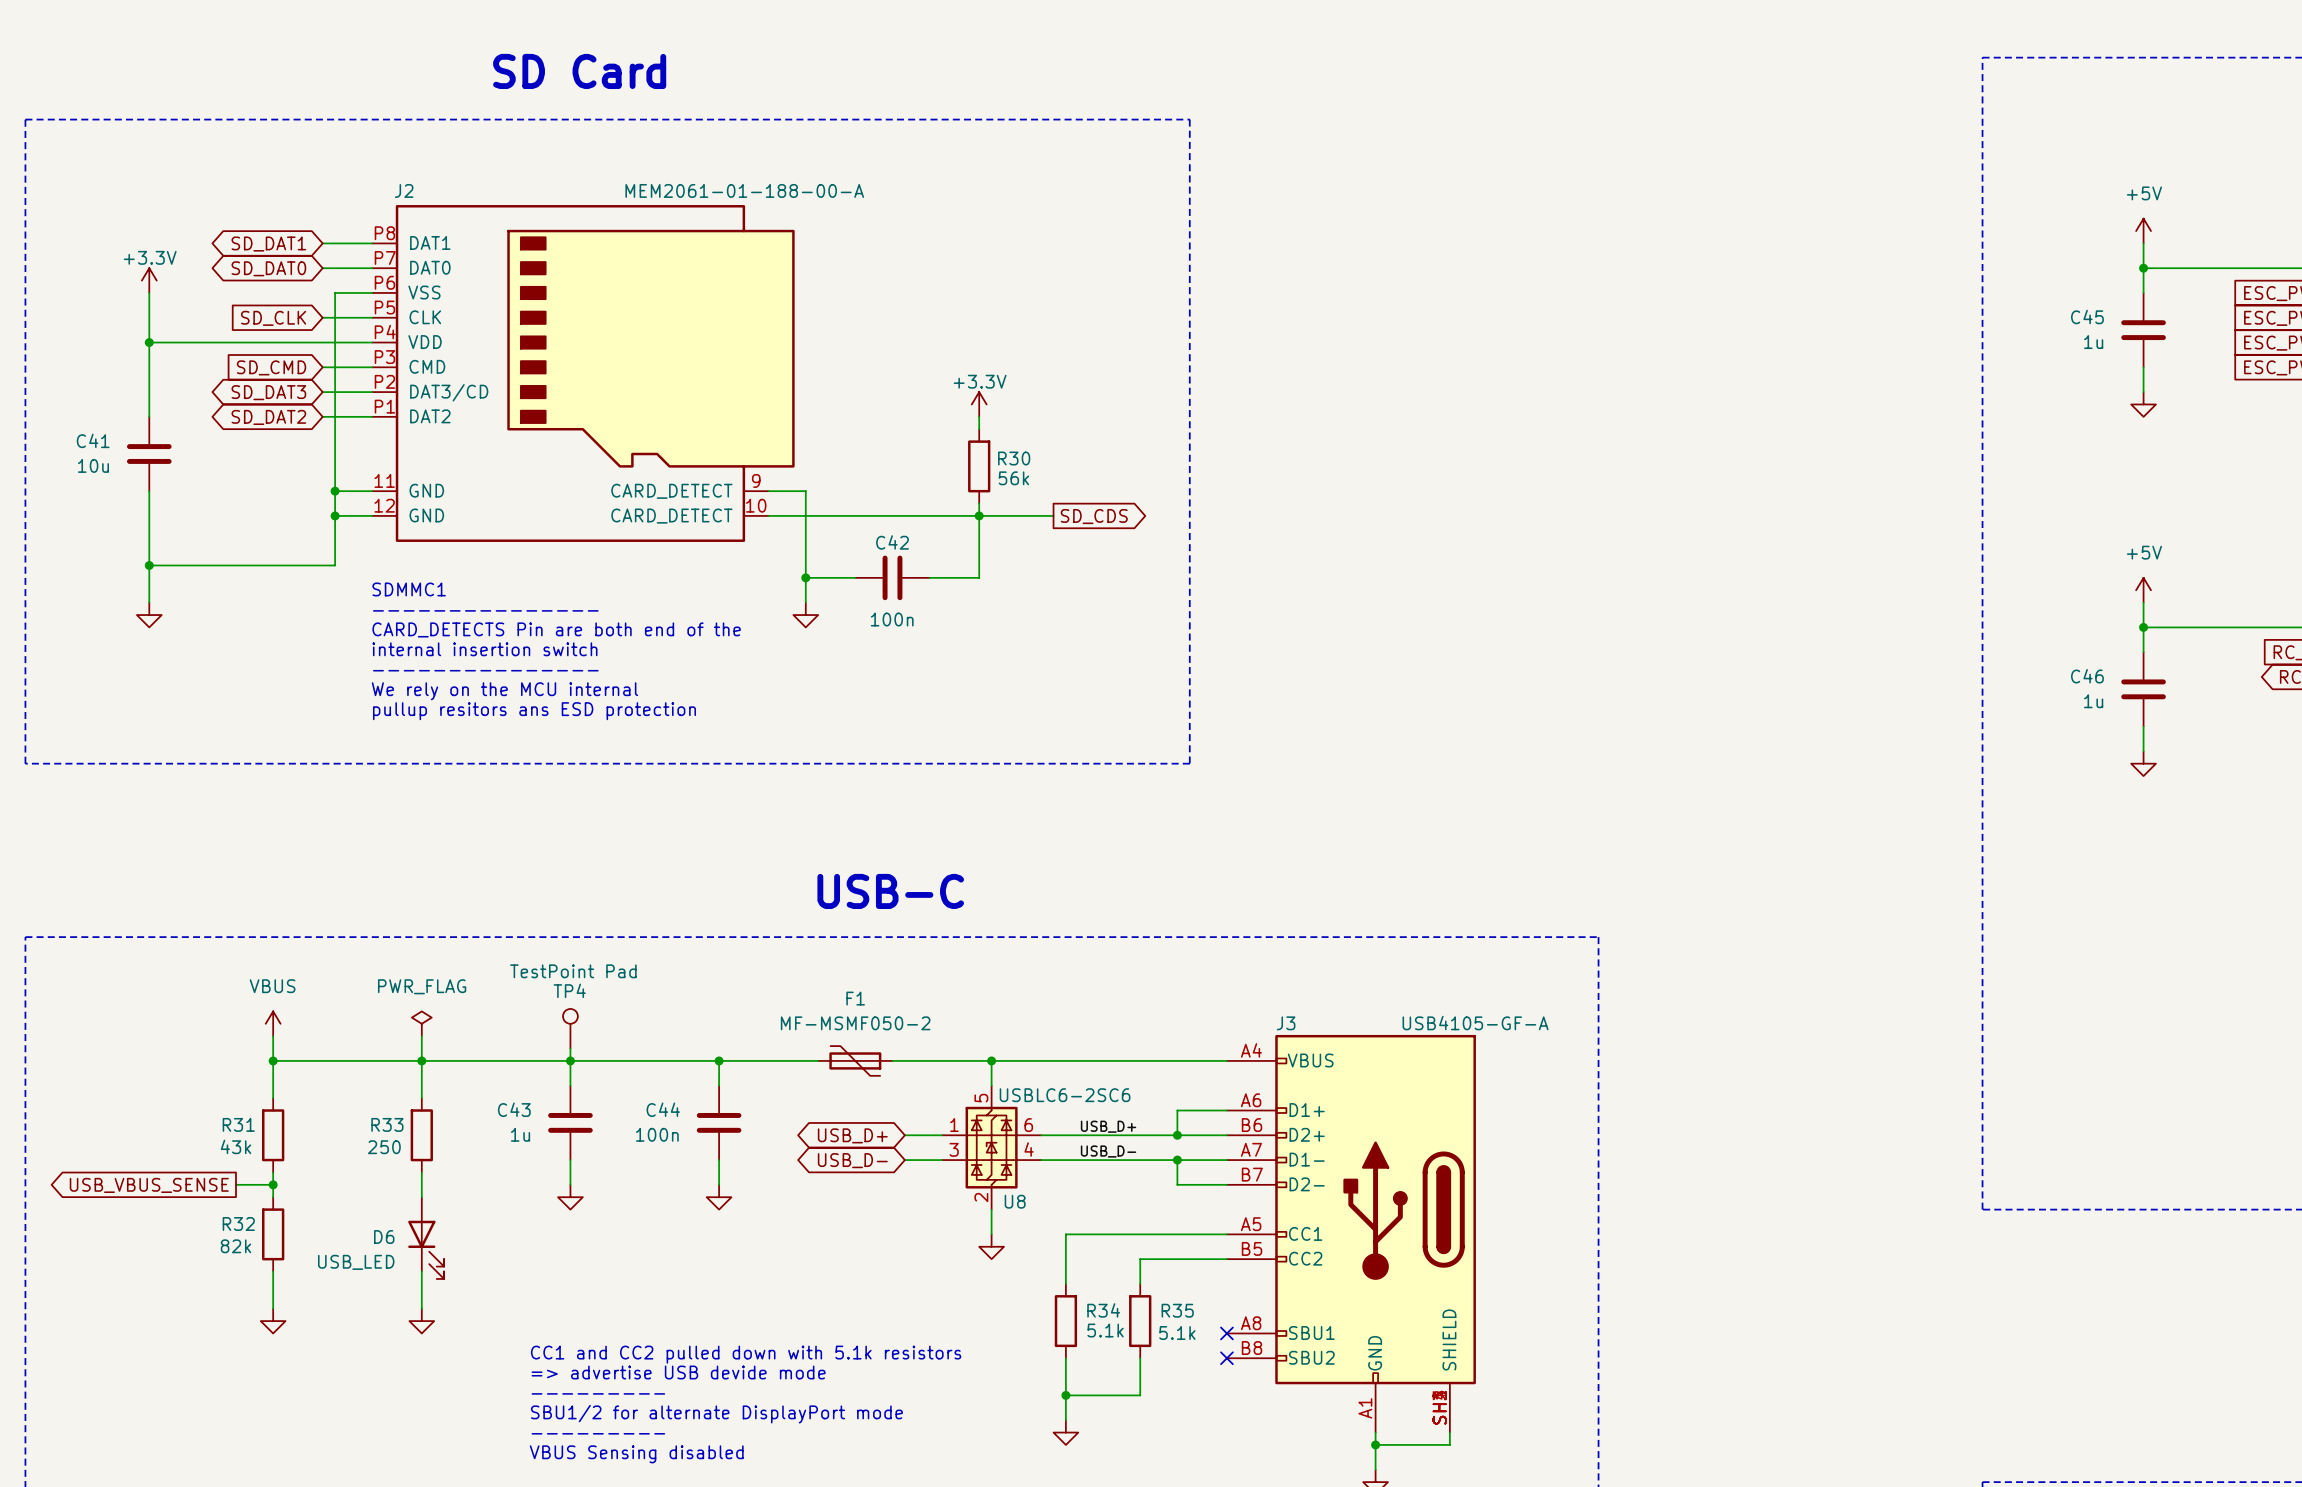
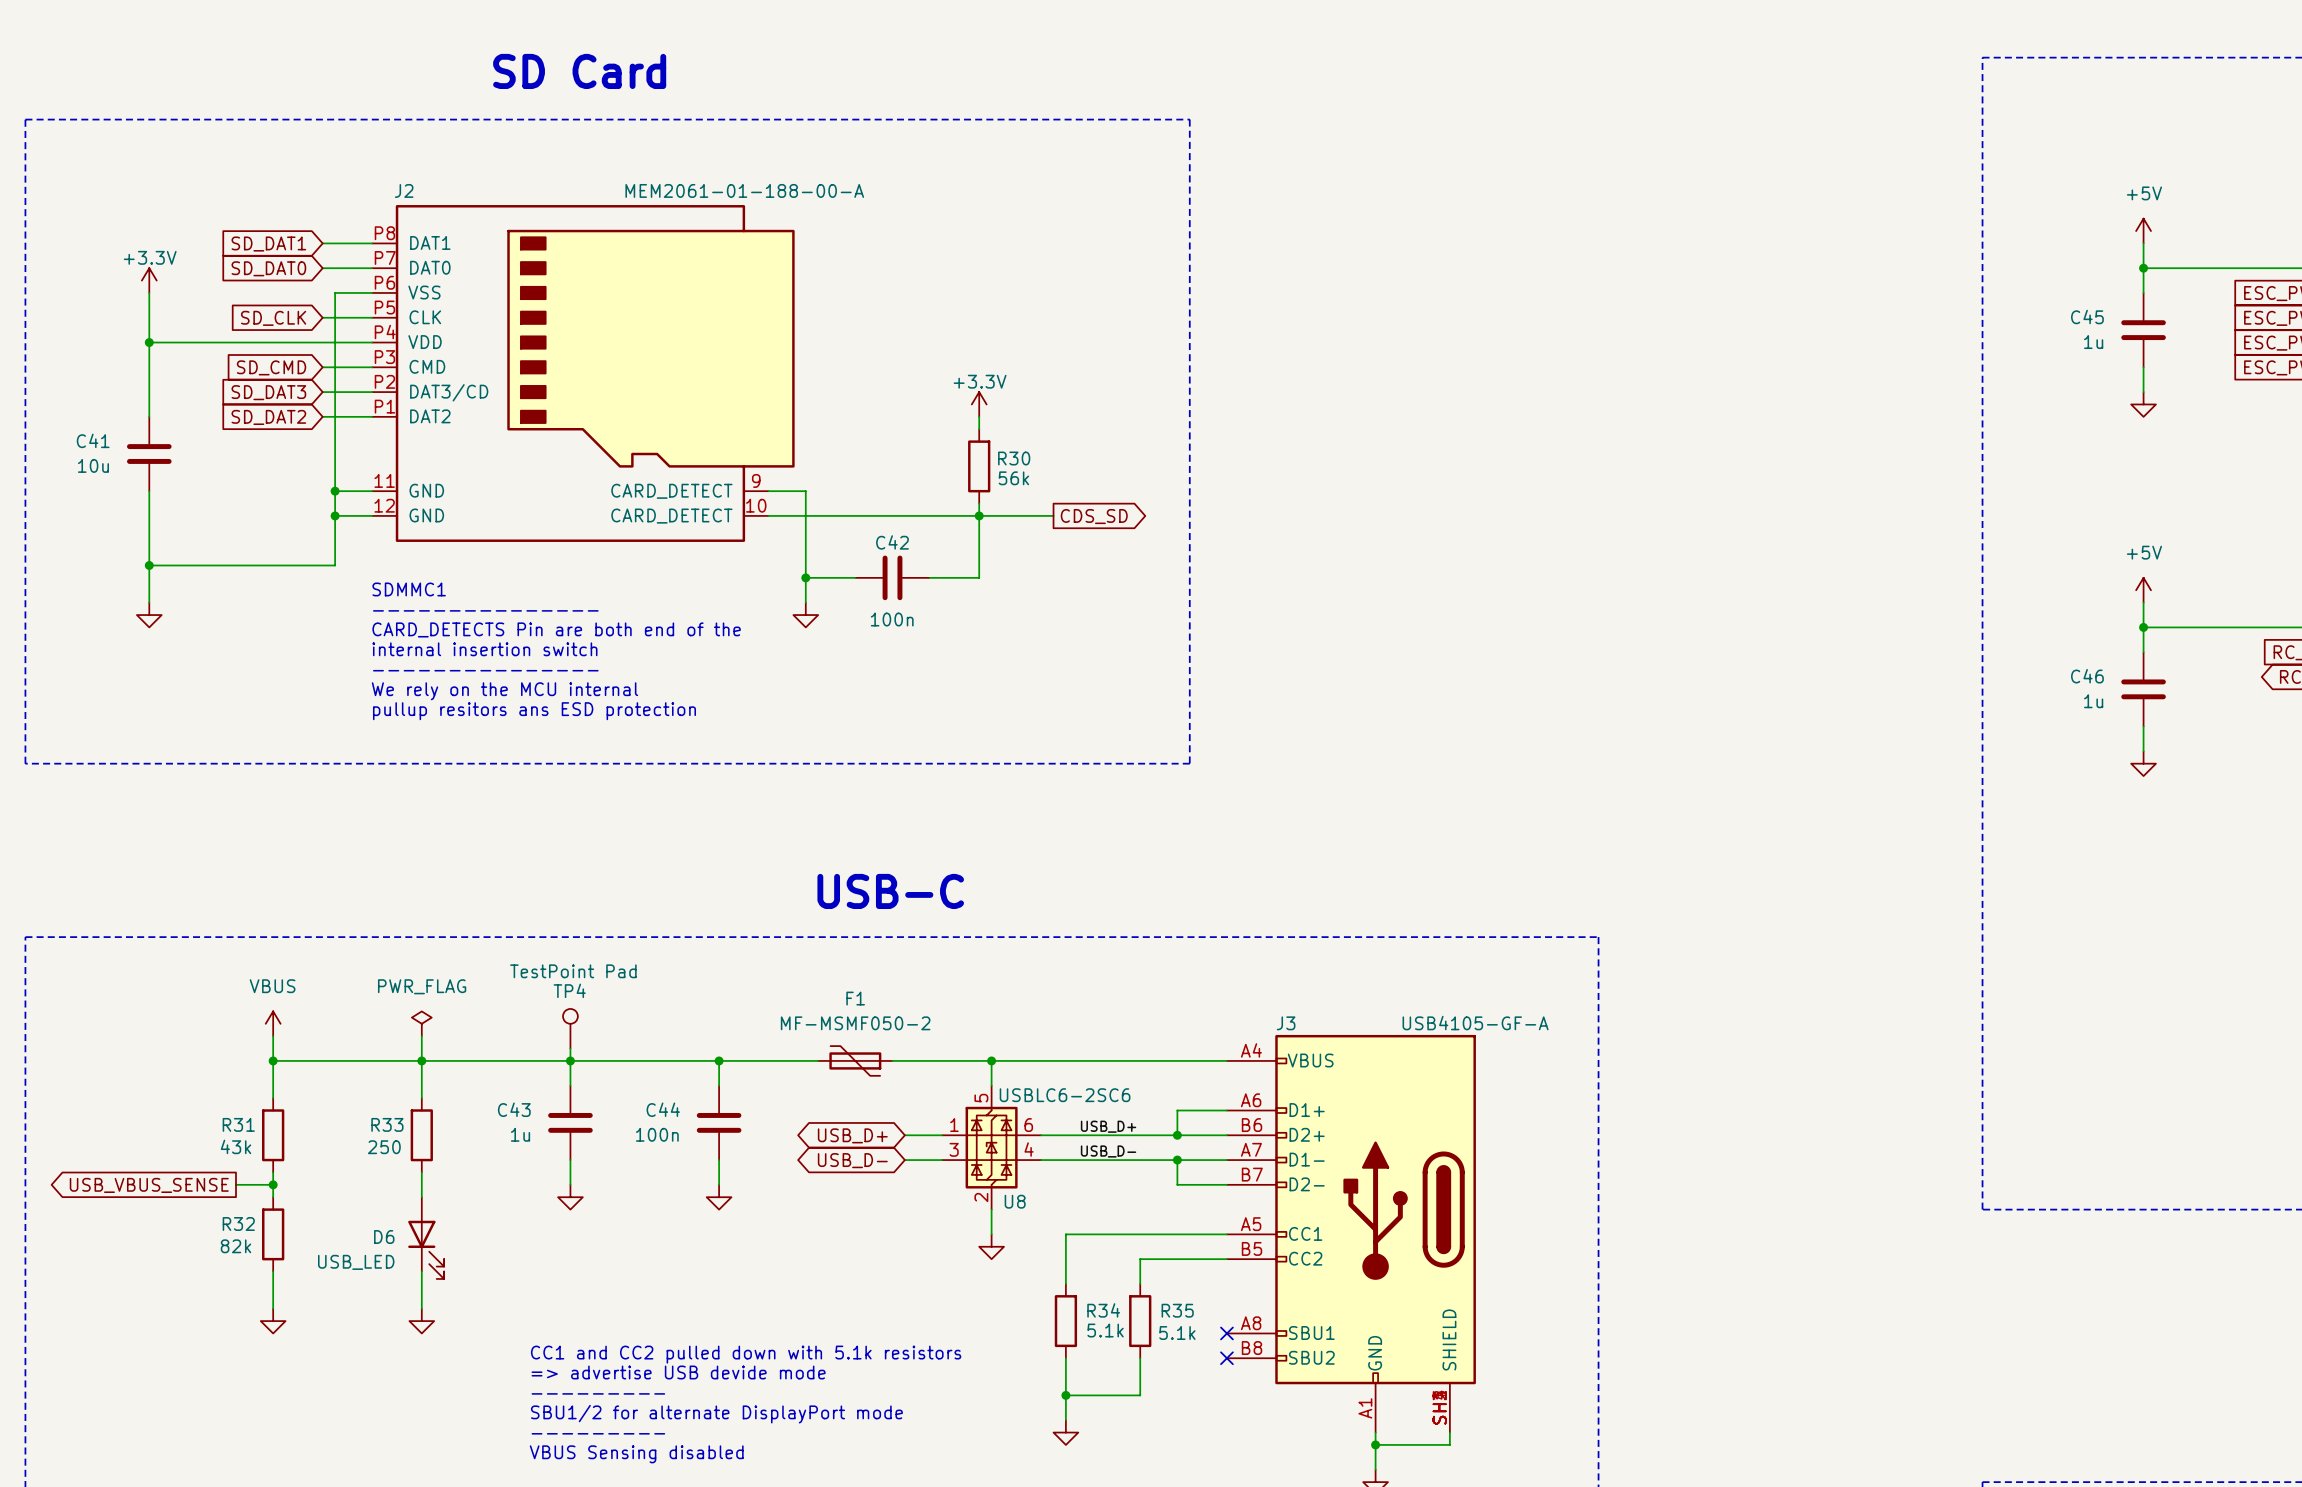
global label shape: bidirectional (268, 244) -> input (268, 244)
global label shape: bidirectional (268, 268) -> input (268, 268)
global label shape: bidirectional (268, 392) -> input (268, 392)
global label shape: bidirectional (268, 417) -> input (268, 417)
global label: SD_CDS (1094, 516) -> CDS_SD (1094, 516)

